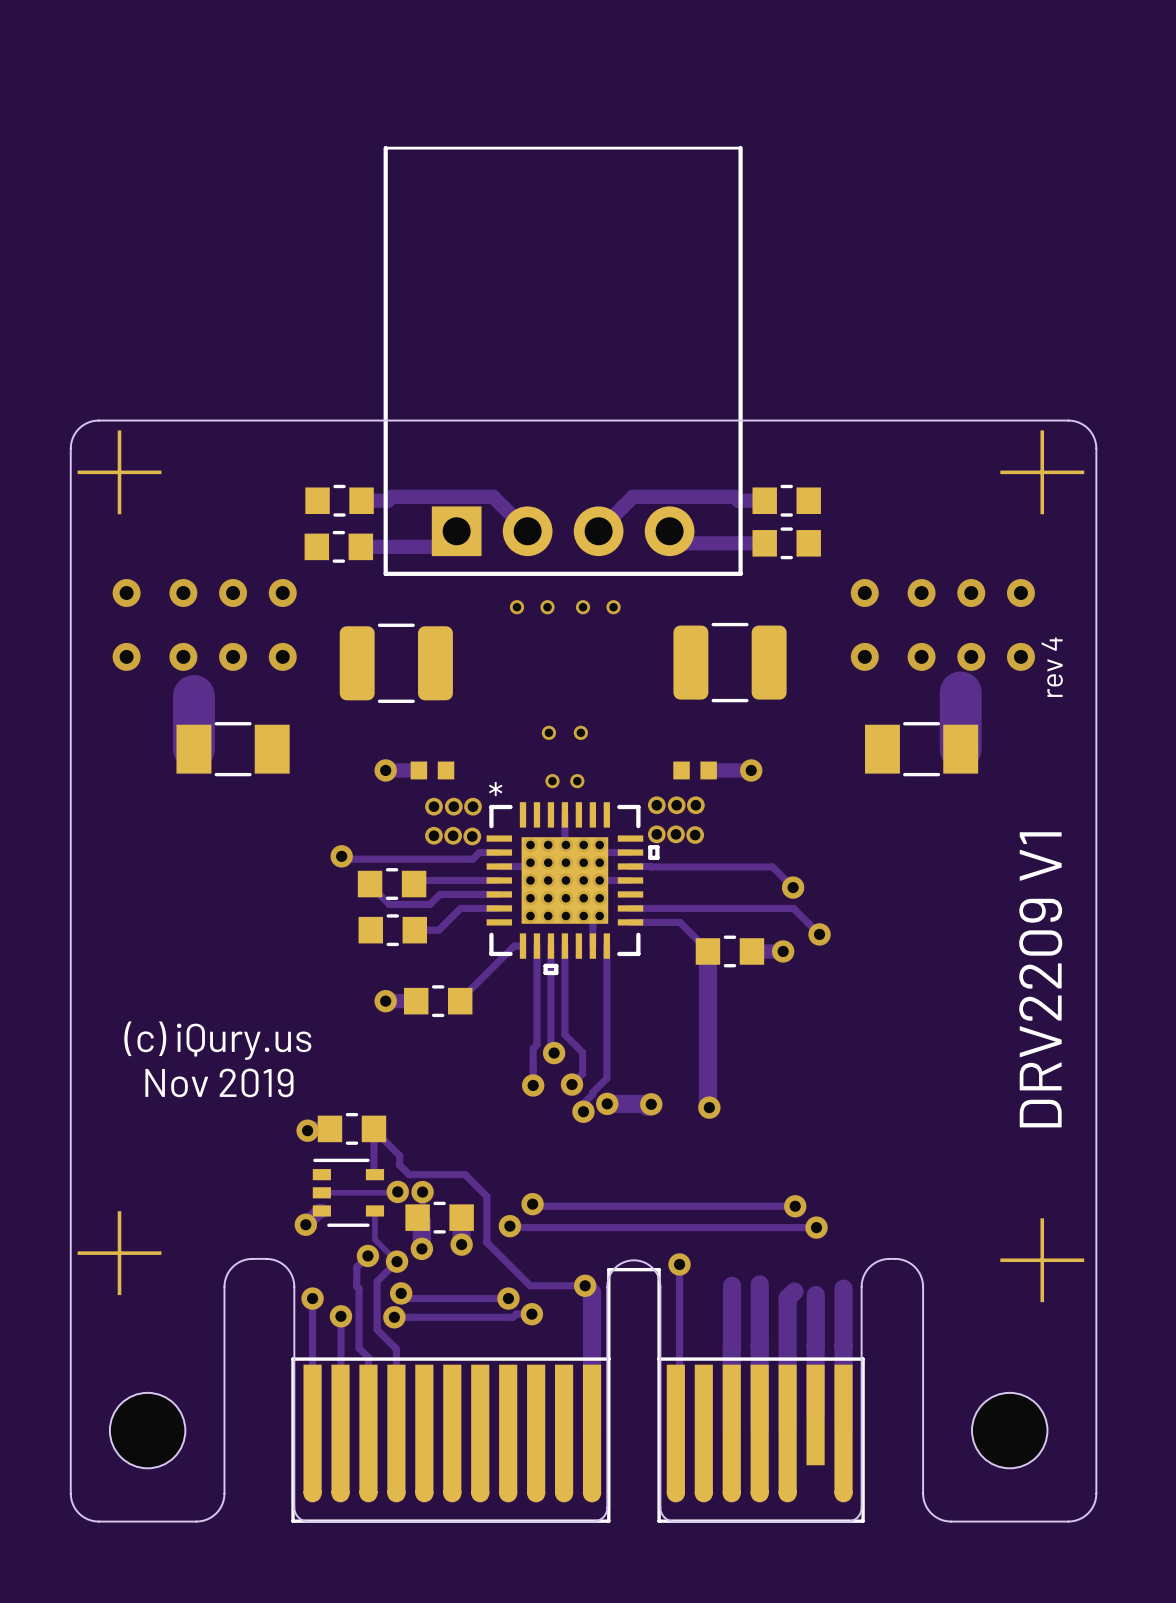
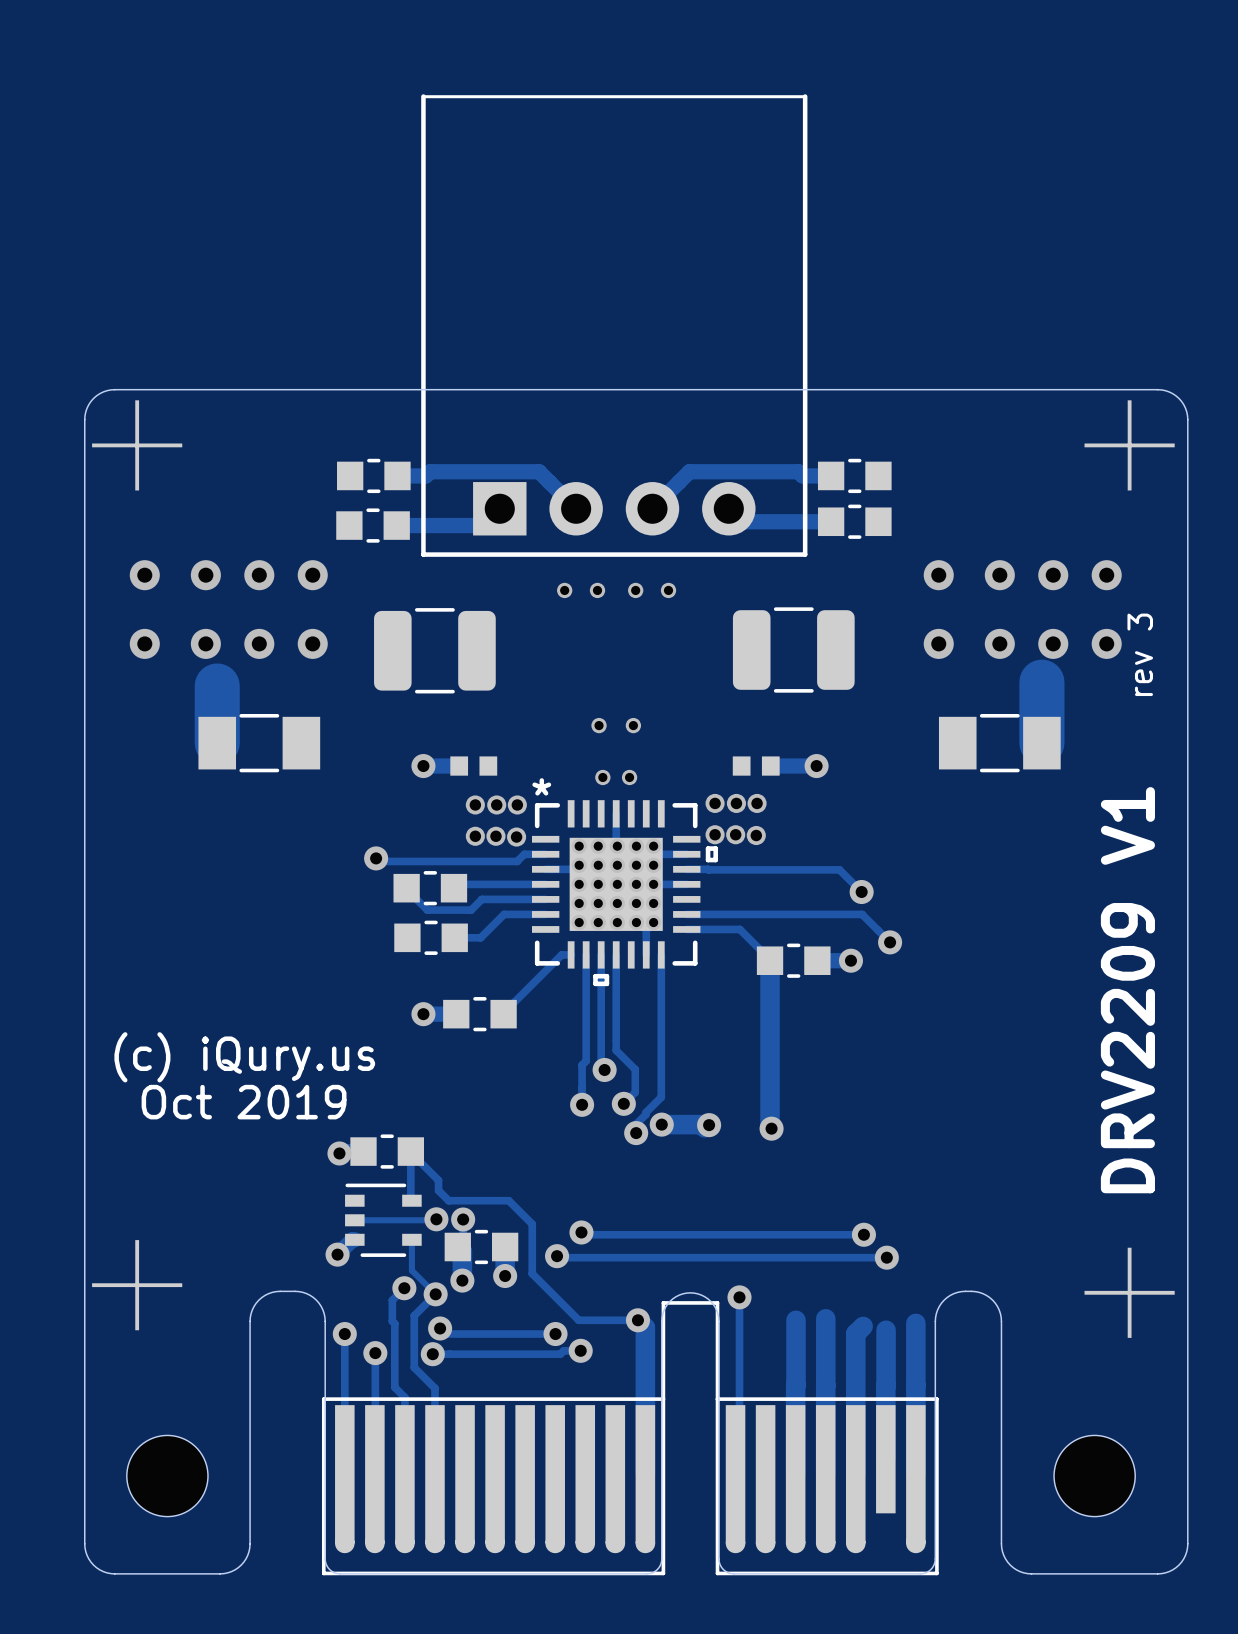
text: rev 4 (1052, 667) -> rev 3 (1140, 654)
text: Nov 2019 (219, 1082) -> Oct 2019 (244, 1102)

